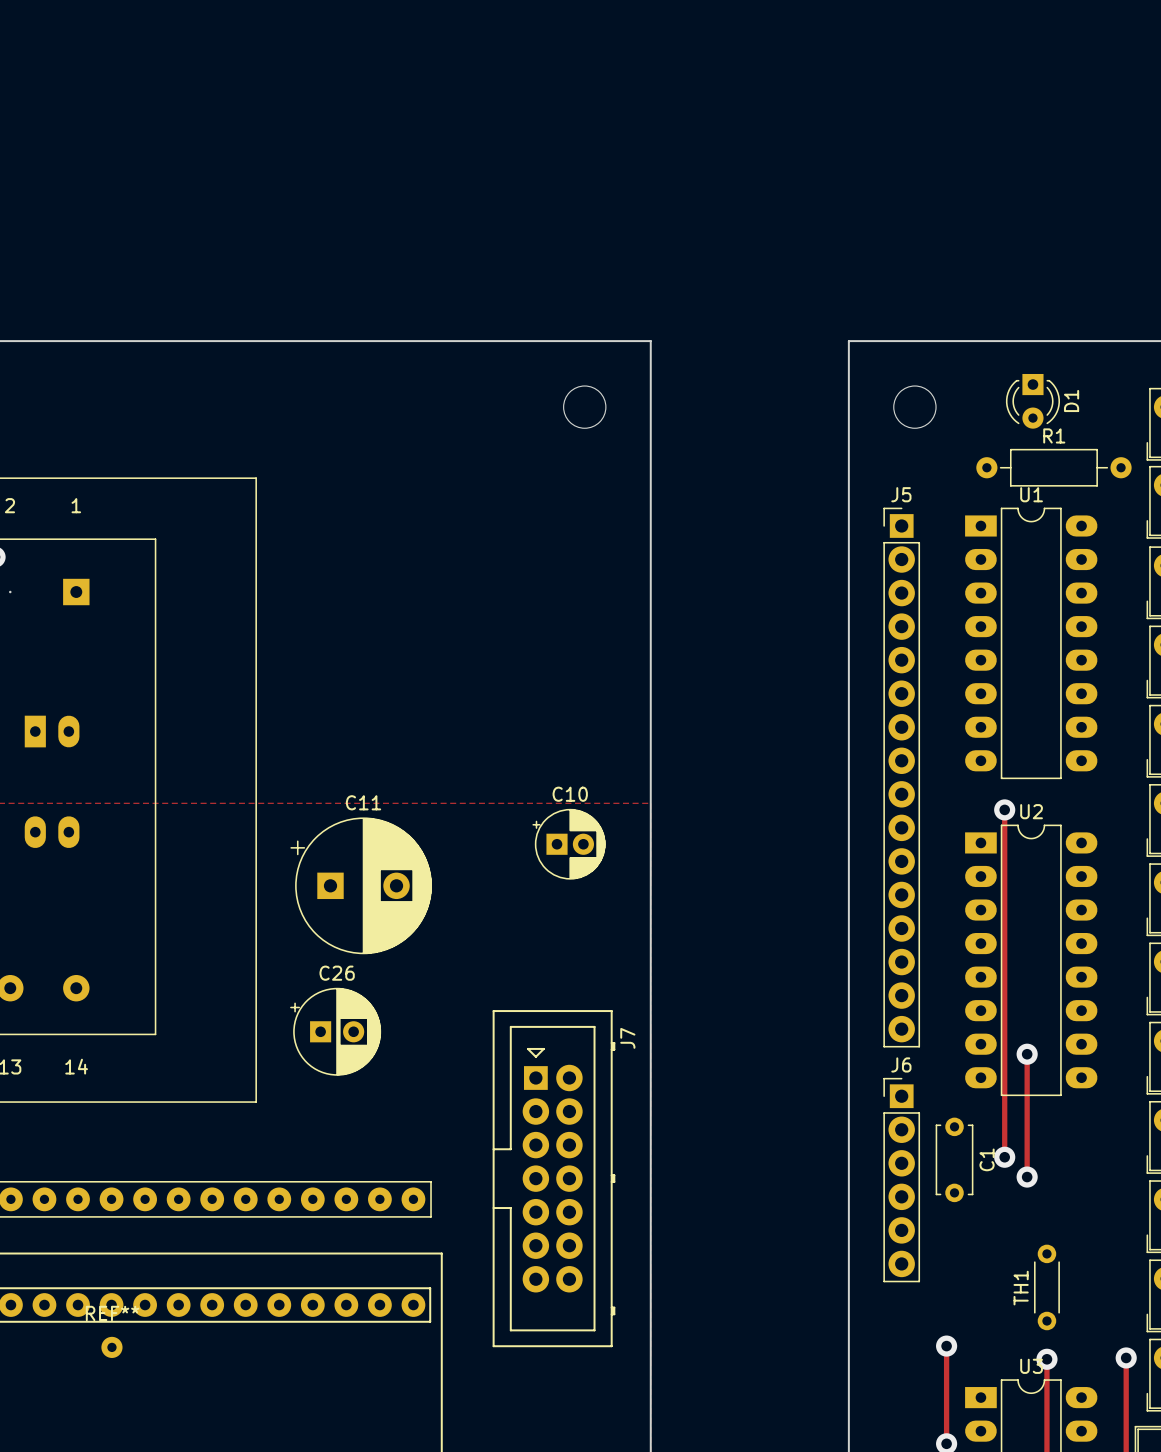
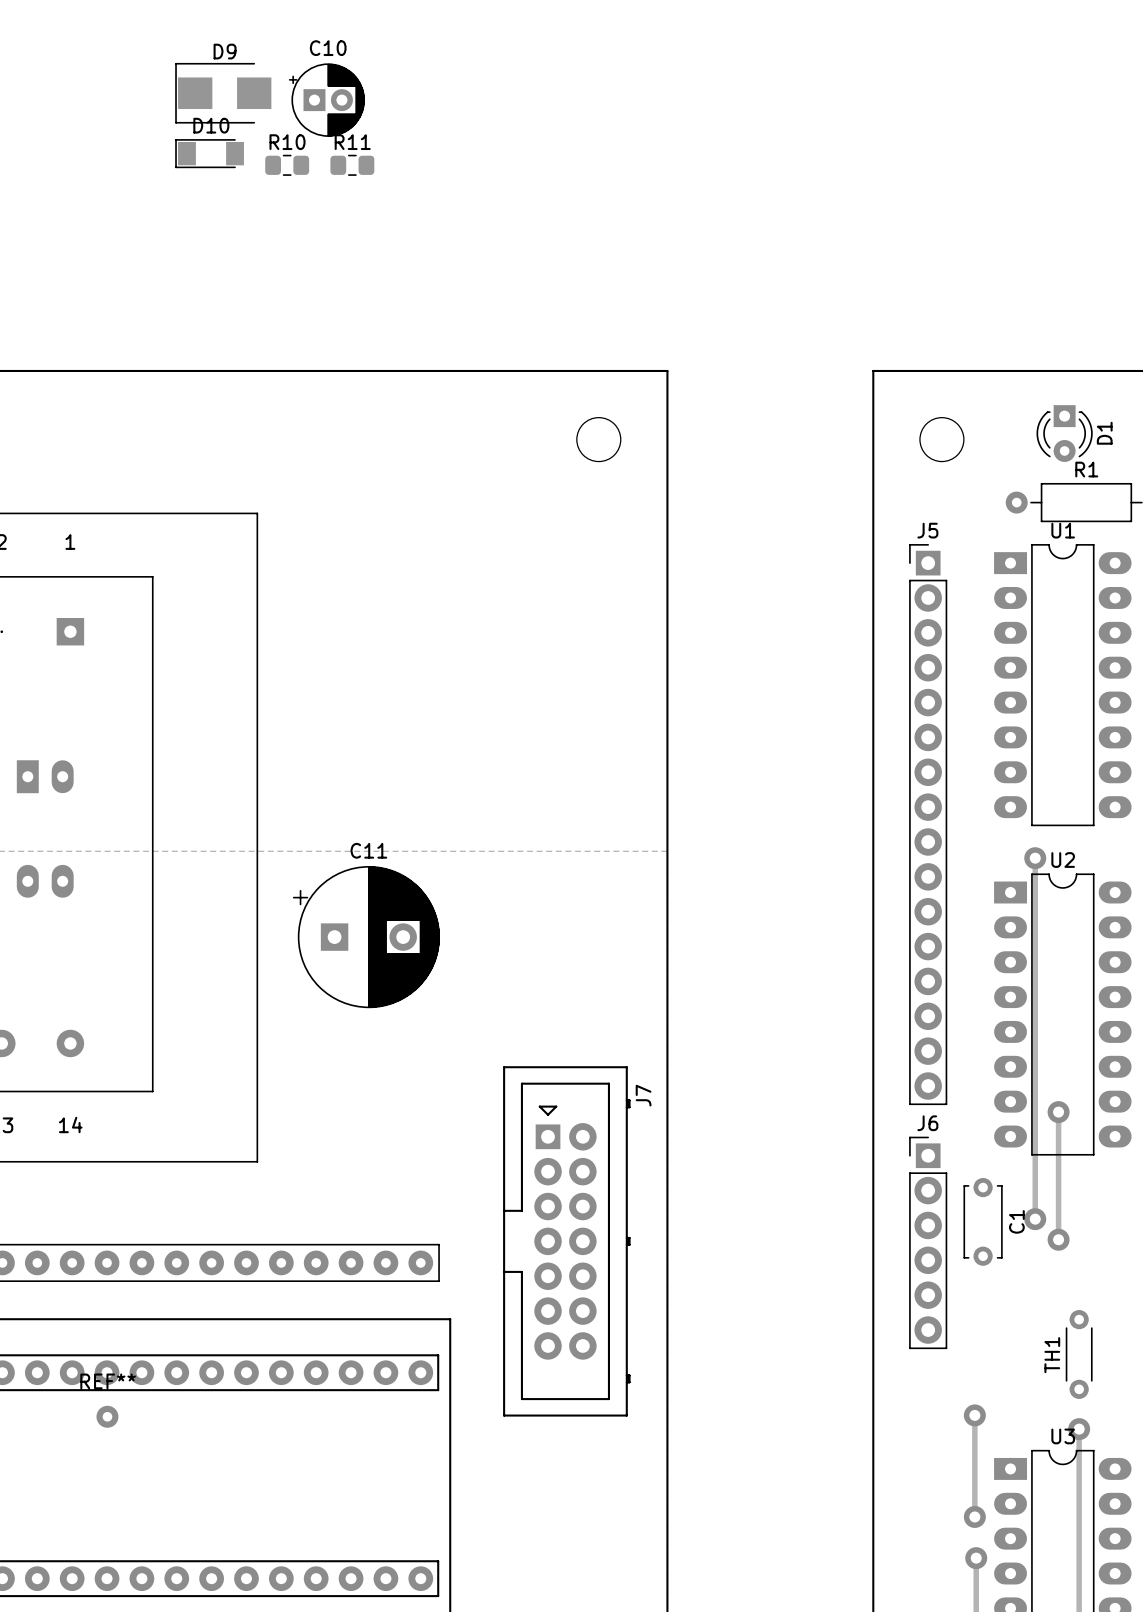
D9: none -> (223, 93)
D10: none -> (209, 153)
R10: none -> (287, 165)
R11: none -> (352, 165)
C10 position: (569, 844) -> (326, 100)
C26: (335, 1031) -> none

